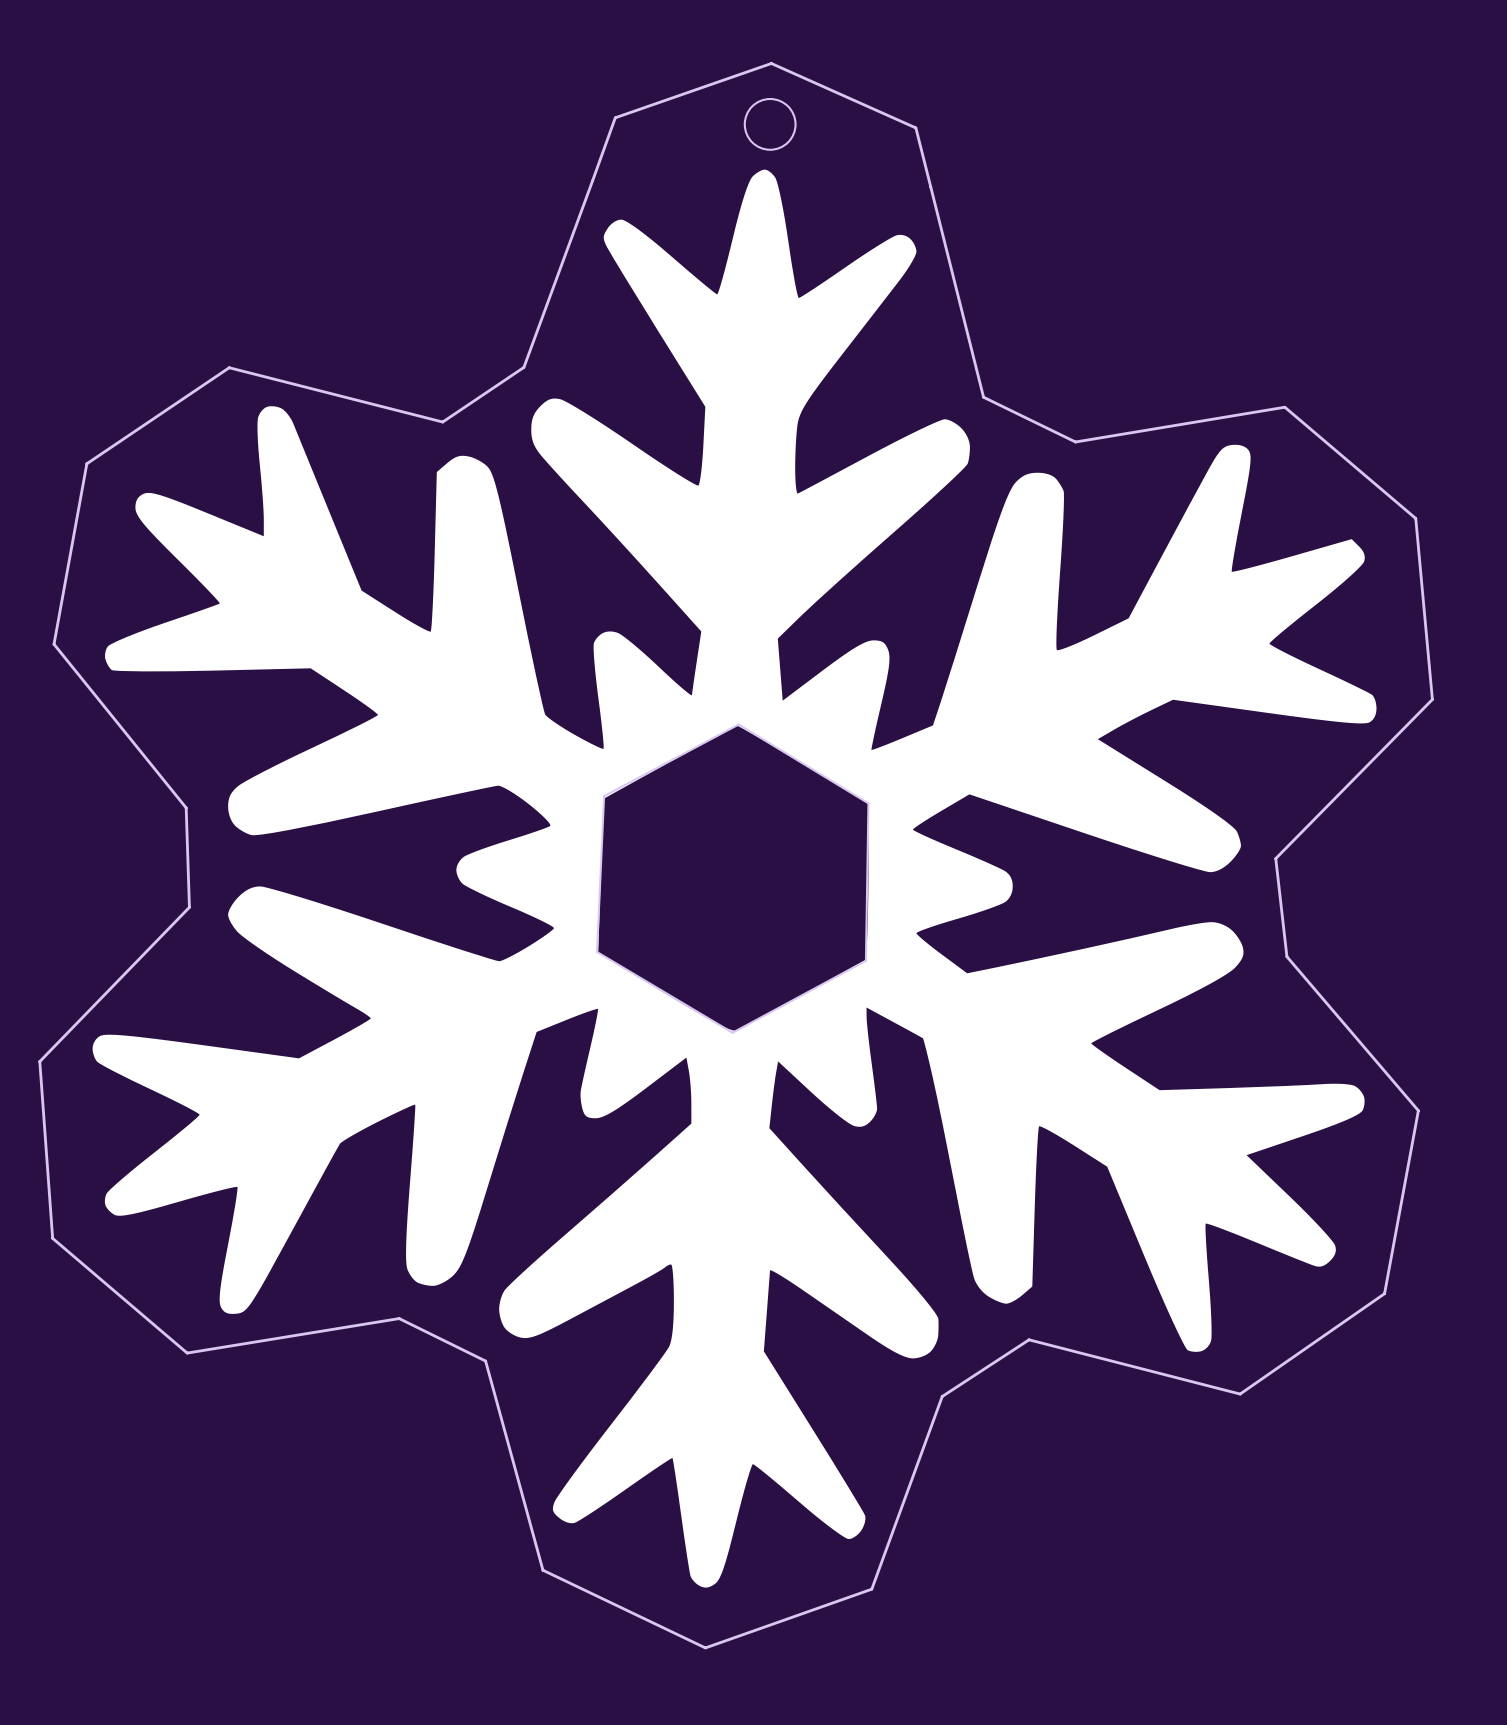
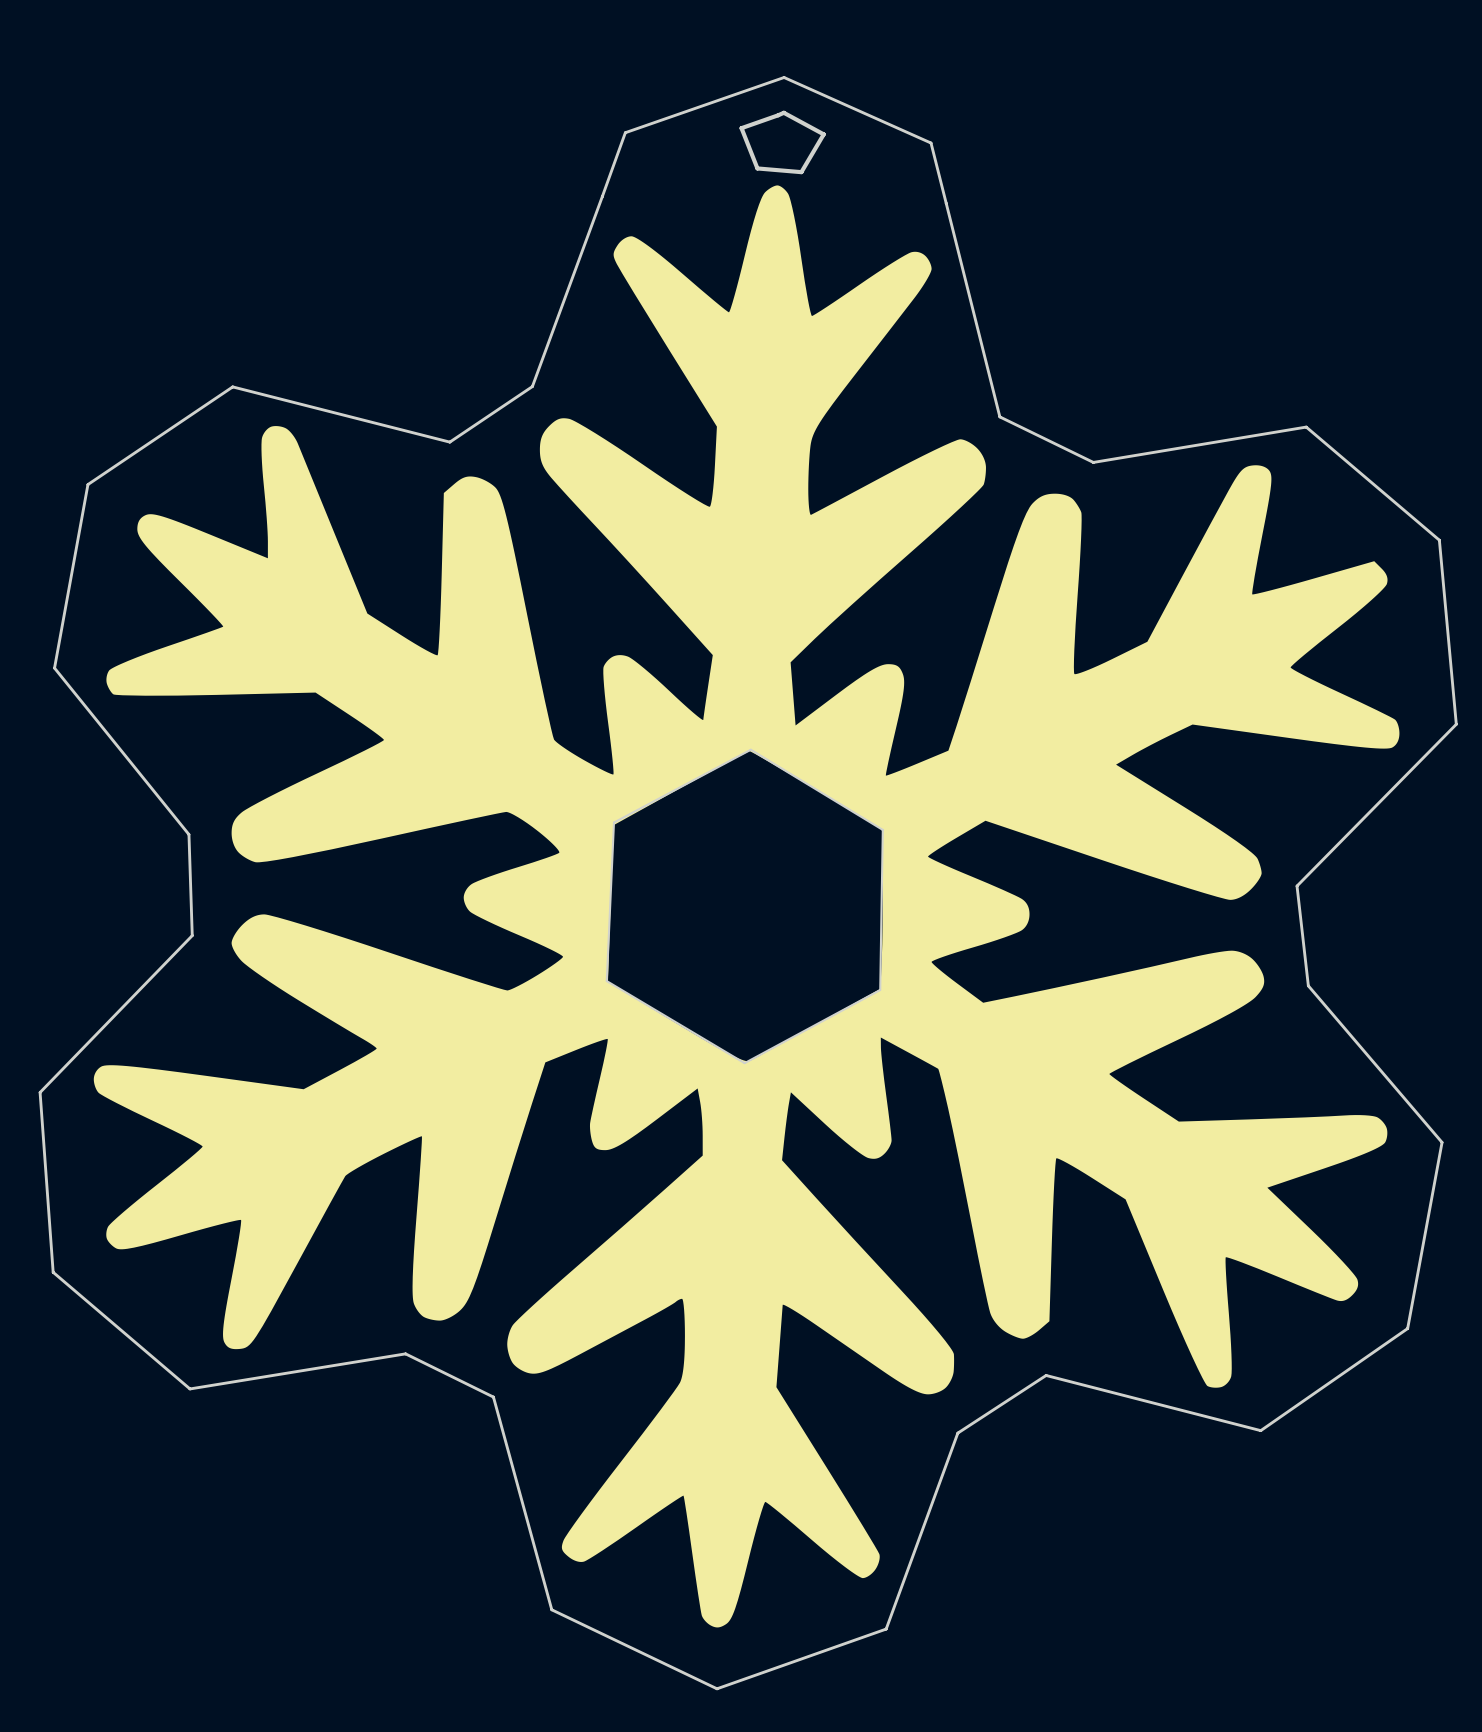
round board edge: [743, 97, 797, 151] -> none
board edge: none -> (783, 112) (823, 134) (801, 172) (757, 168) (741, 128) (783, 112)

